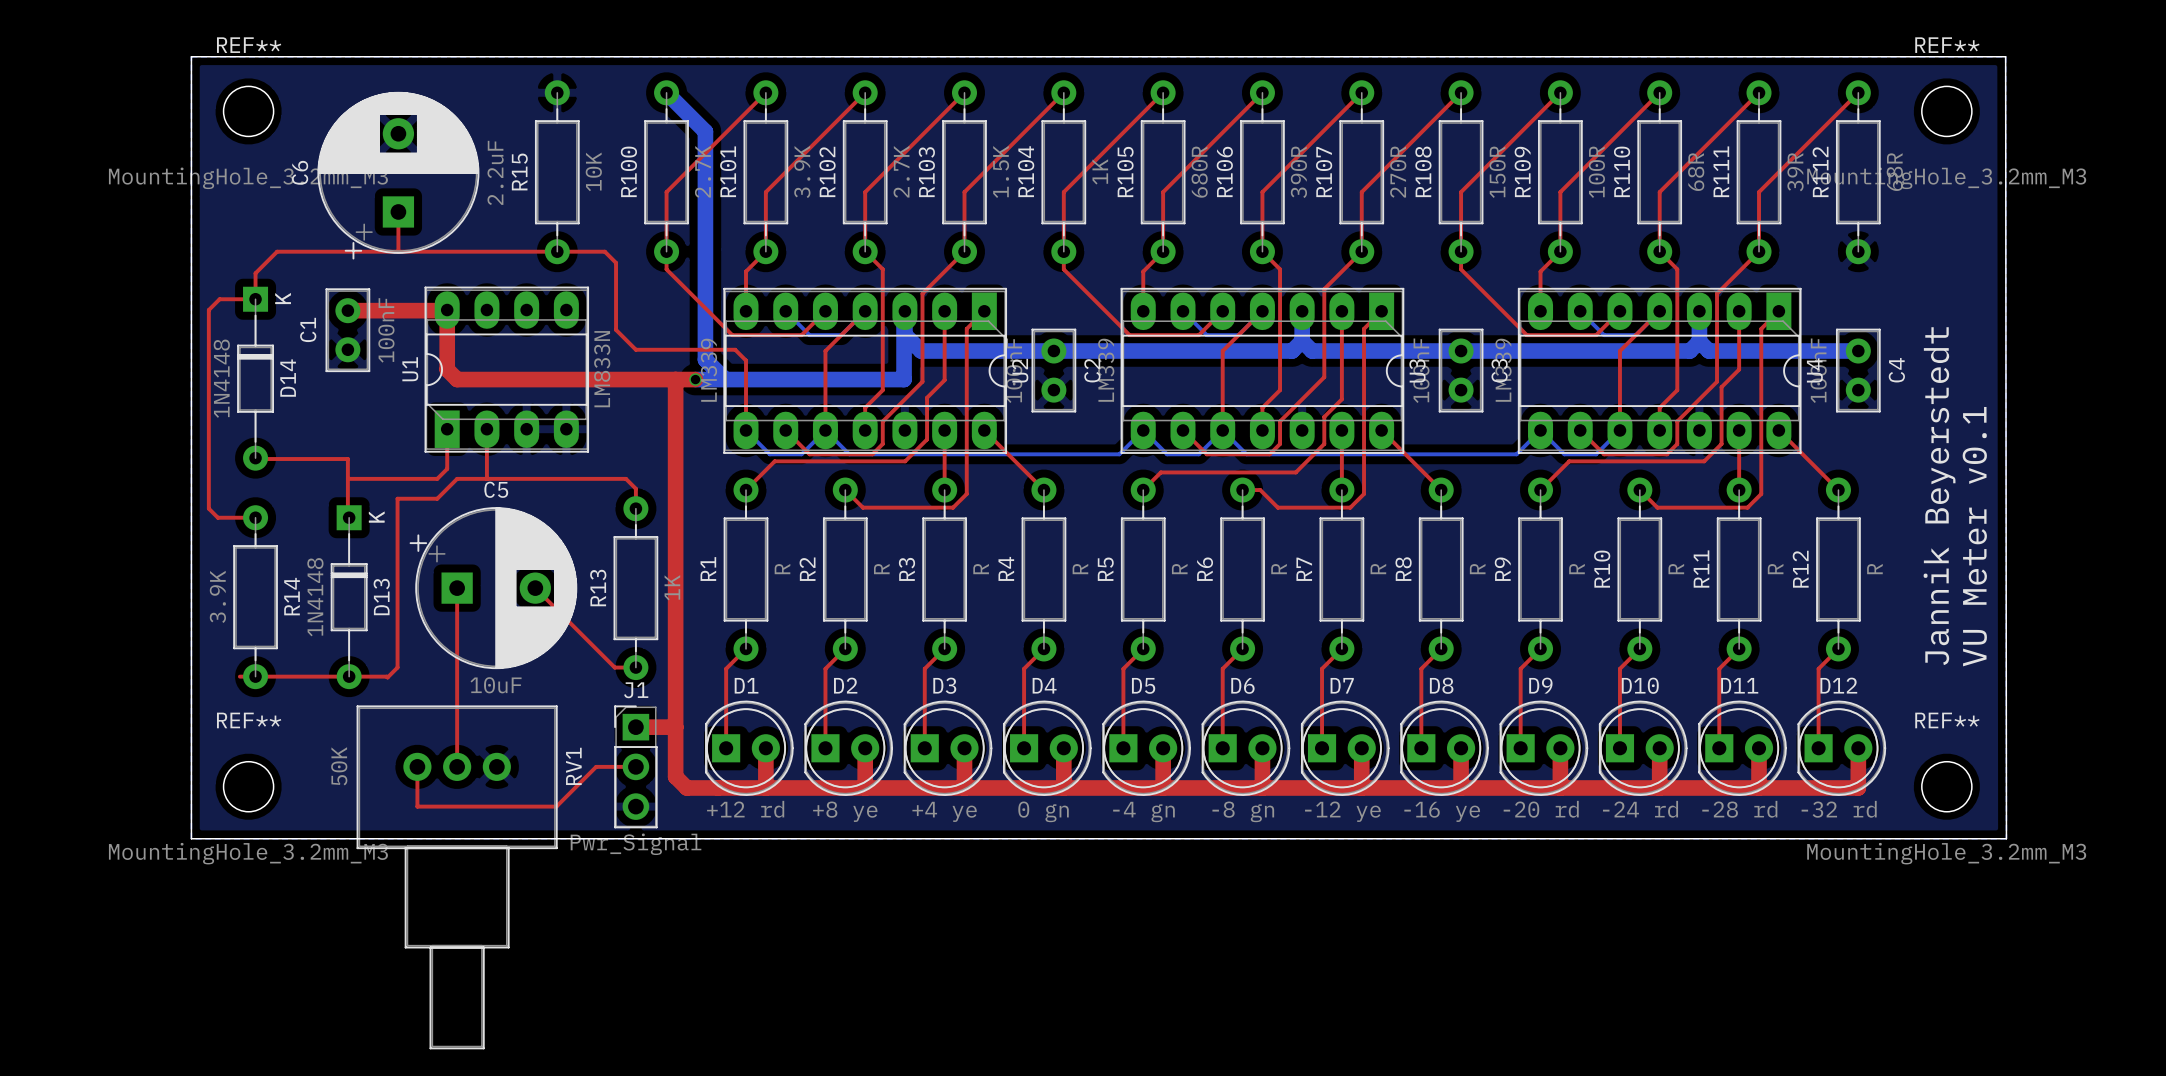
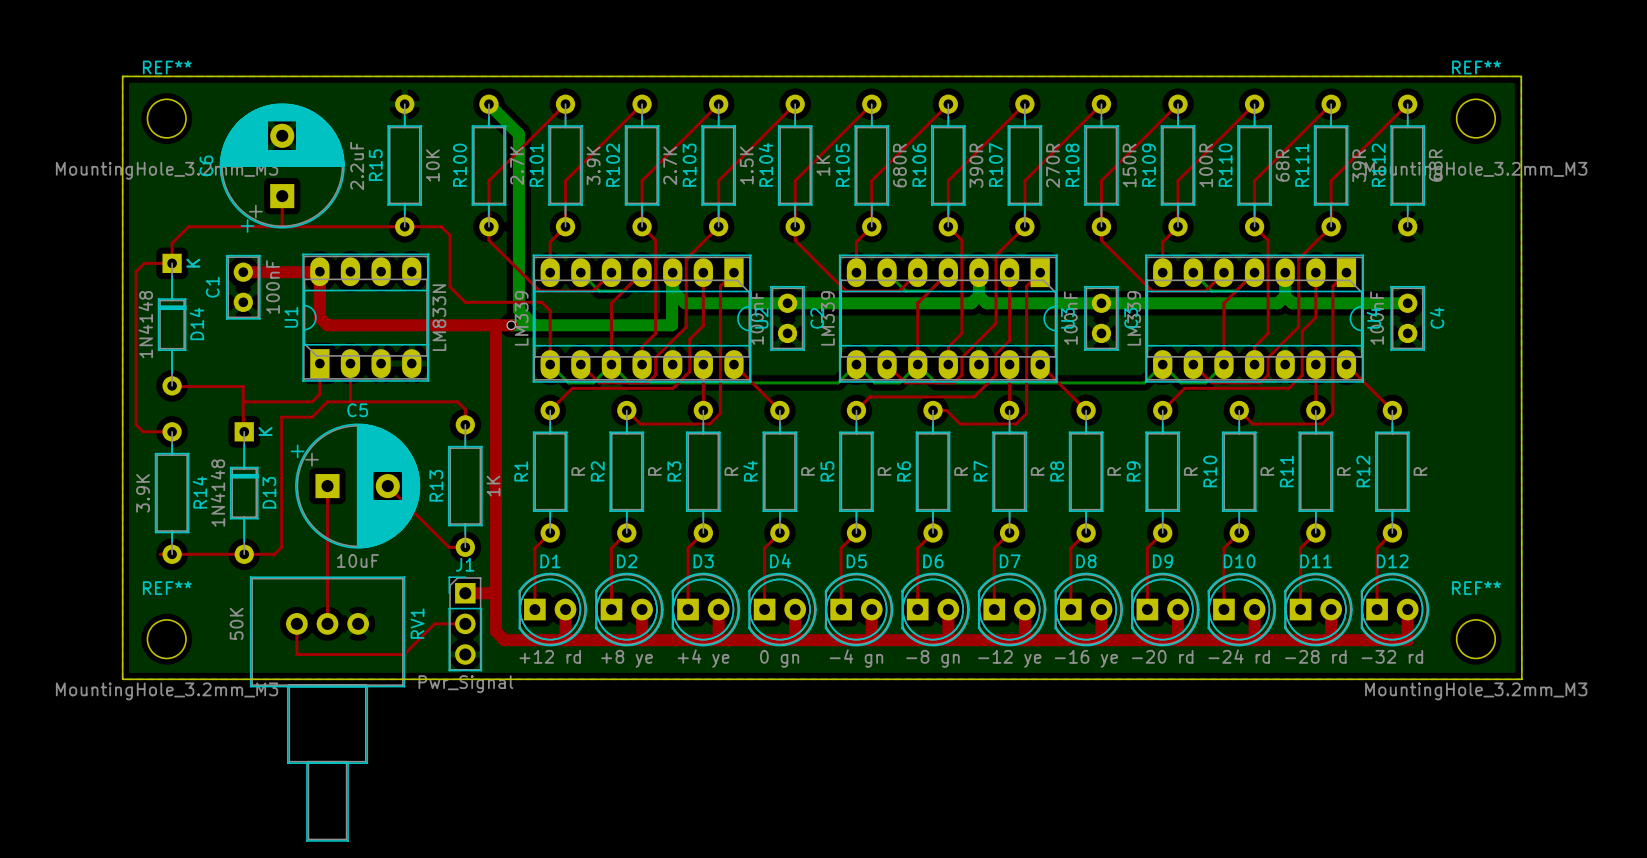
text: Jannik Beyerstedt (1939, 496) -> none
text: VU Meter v0.1 (1974, 536) -> none

